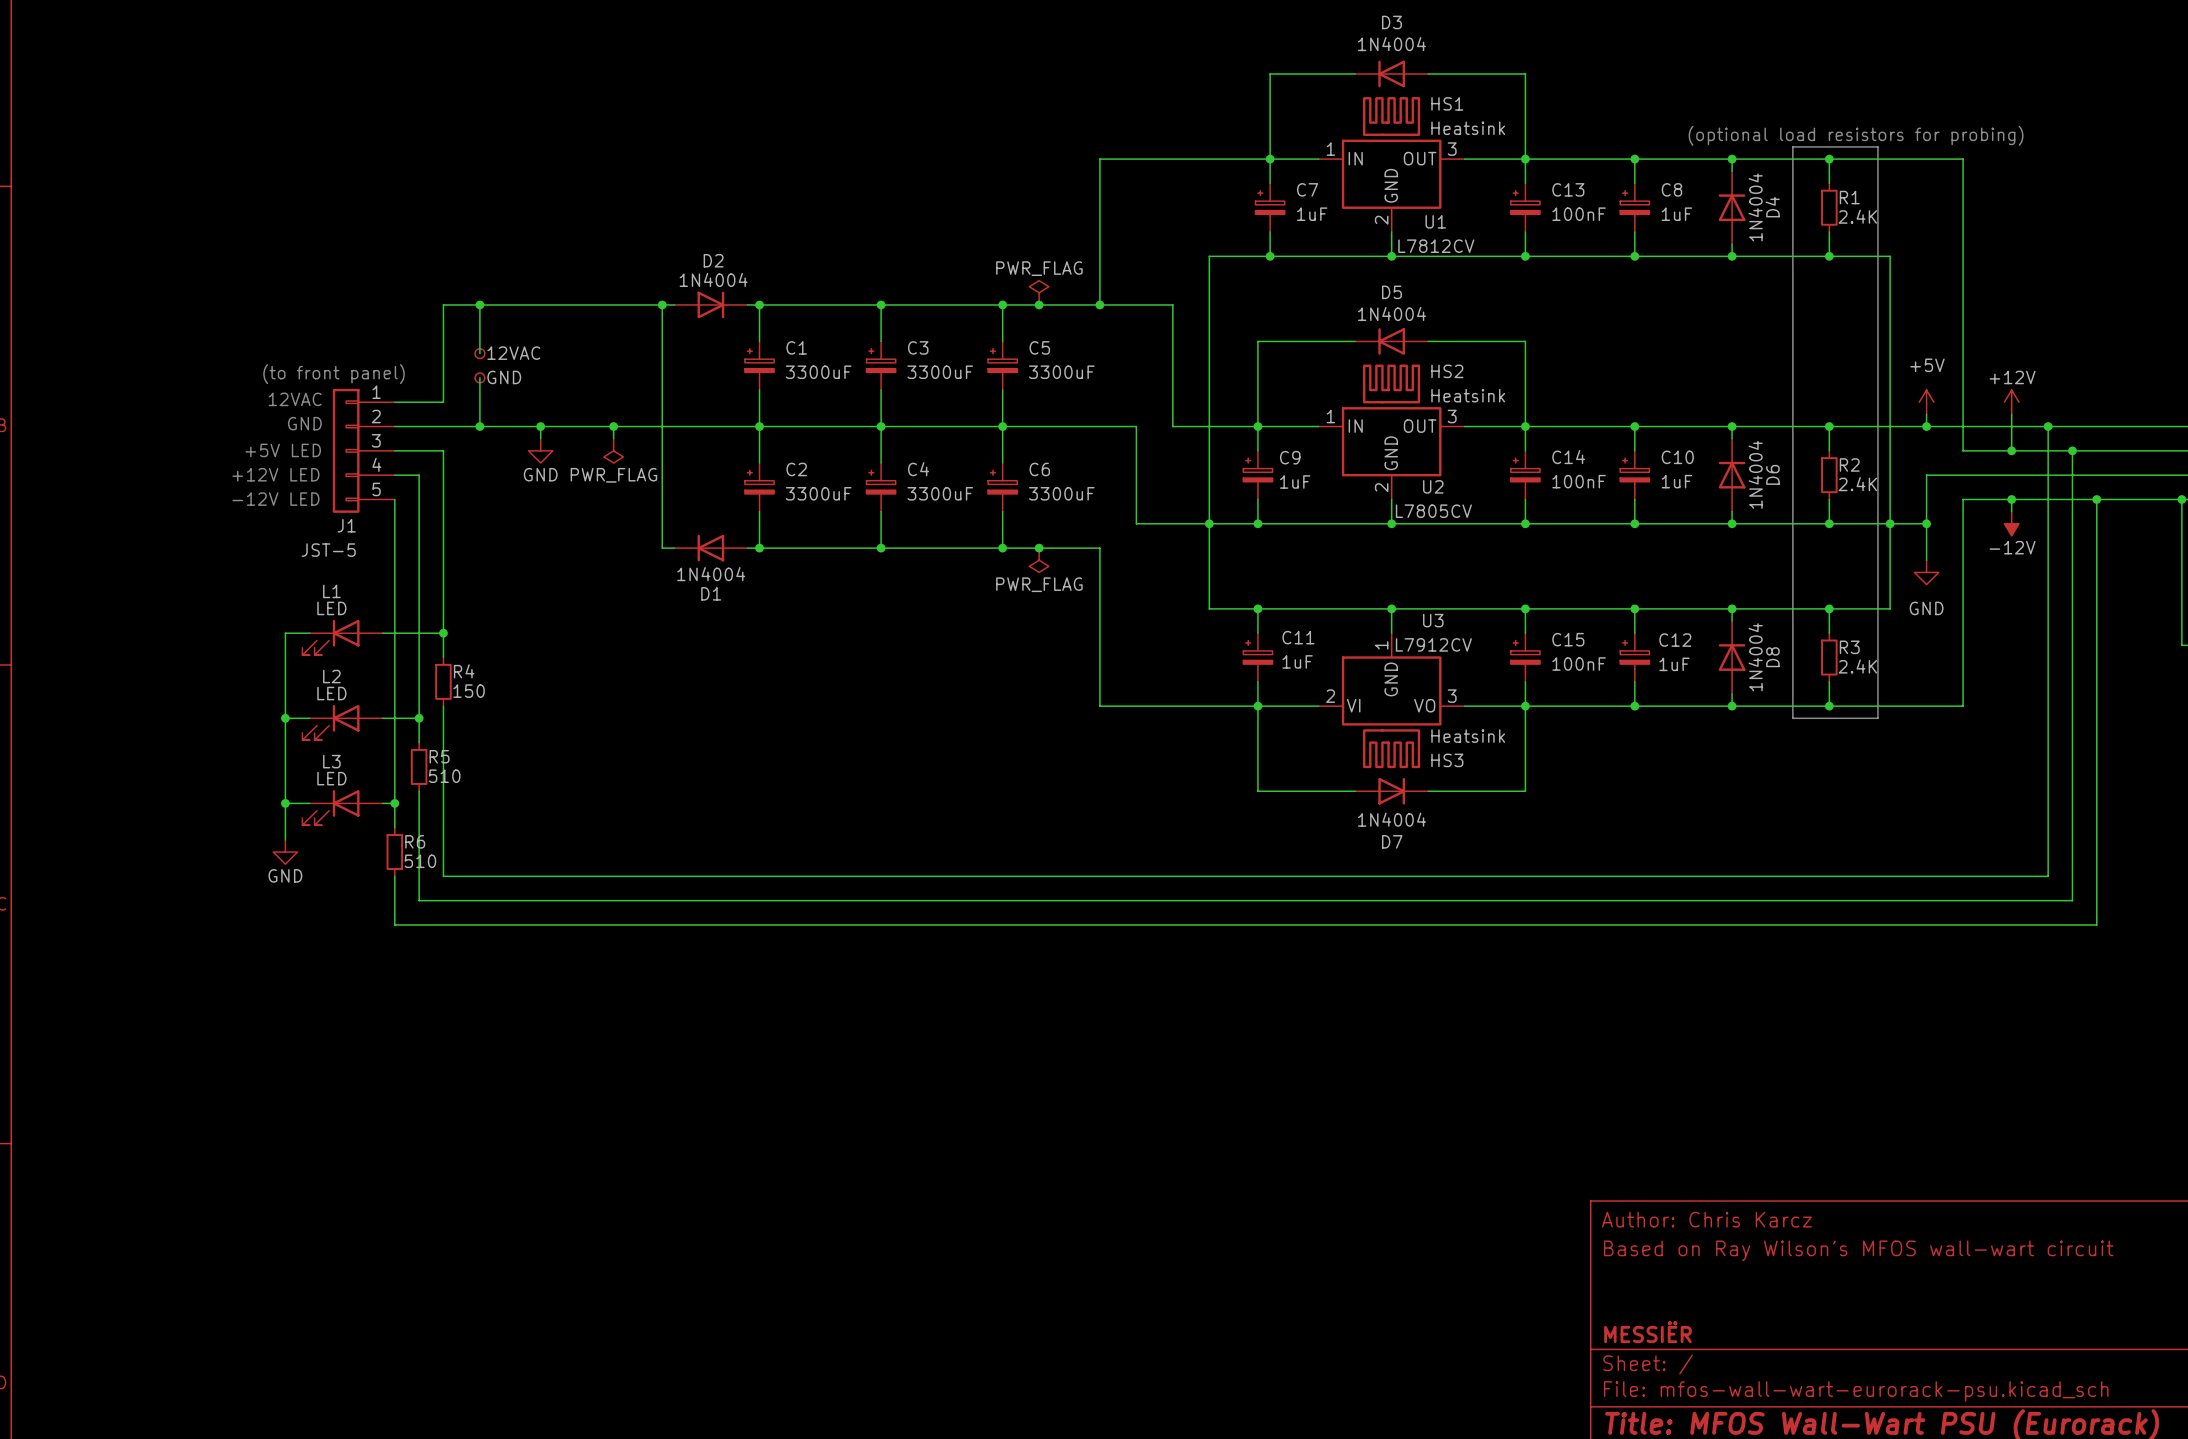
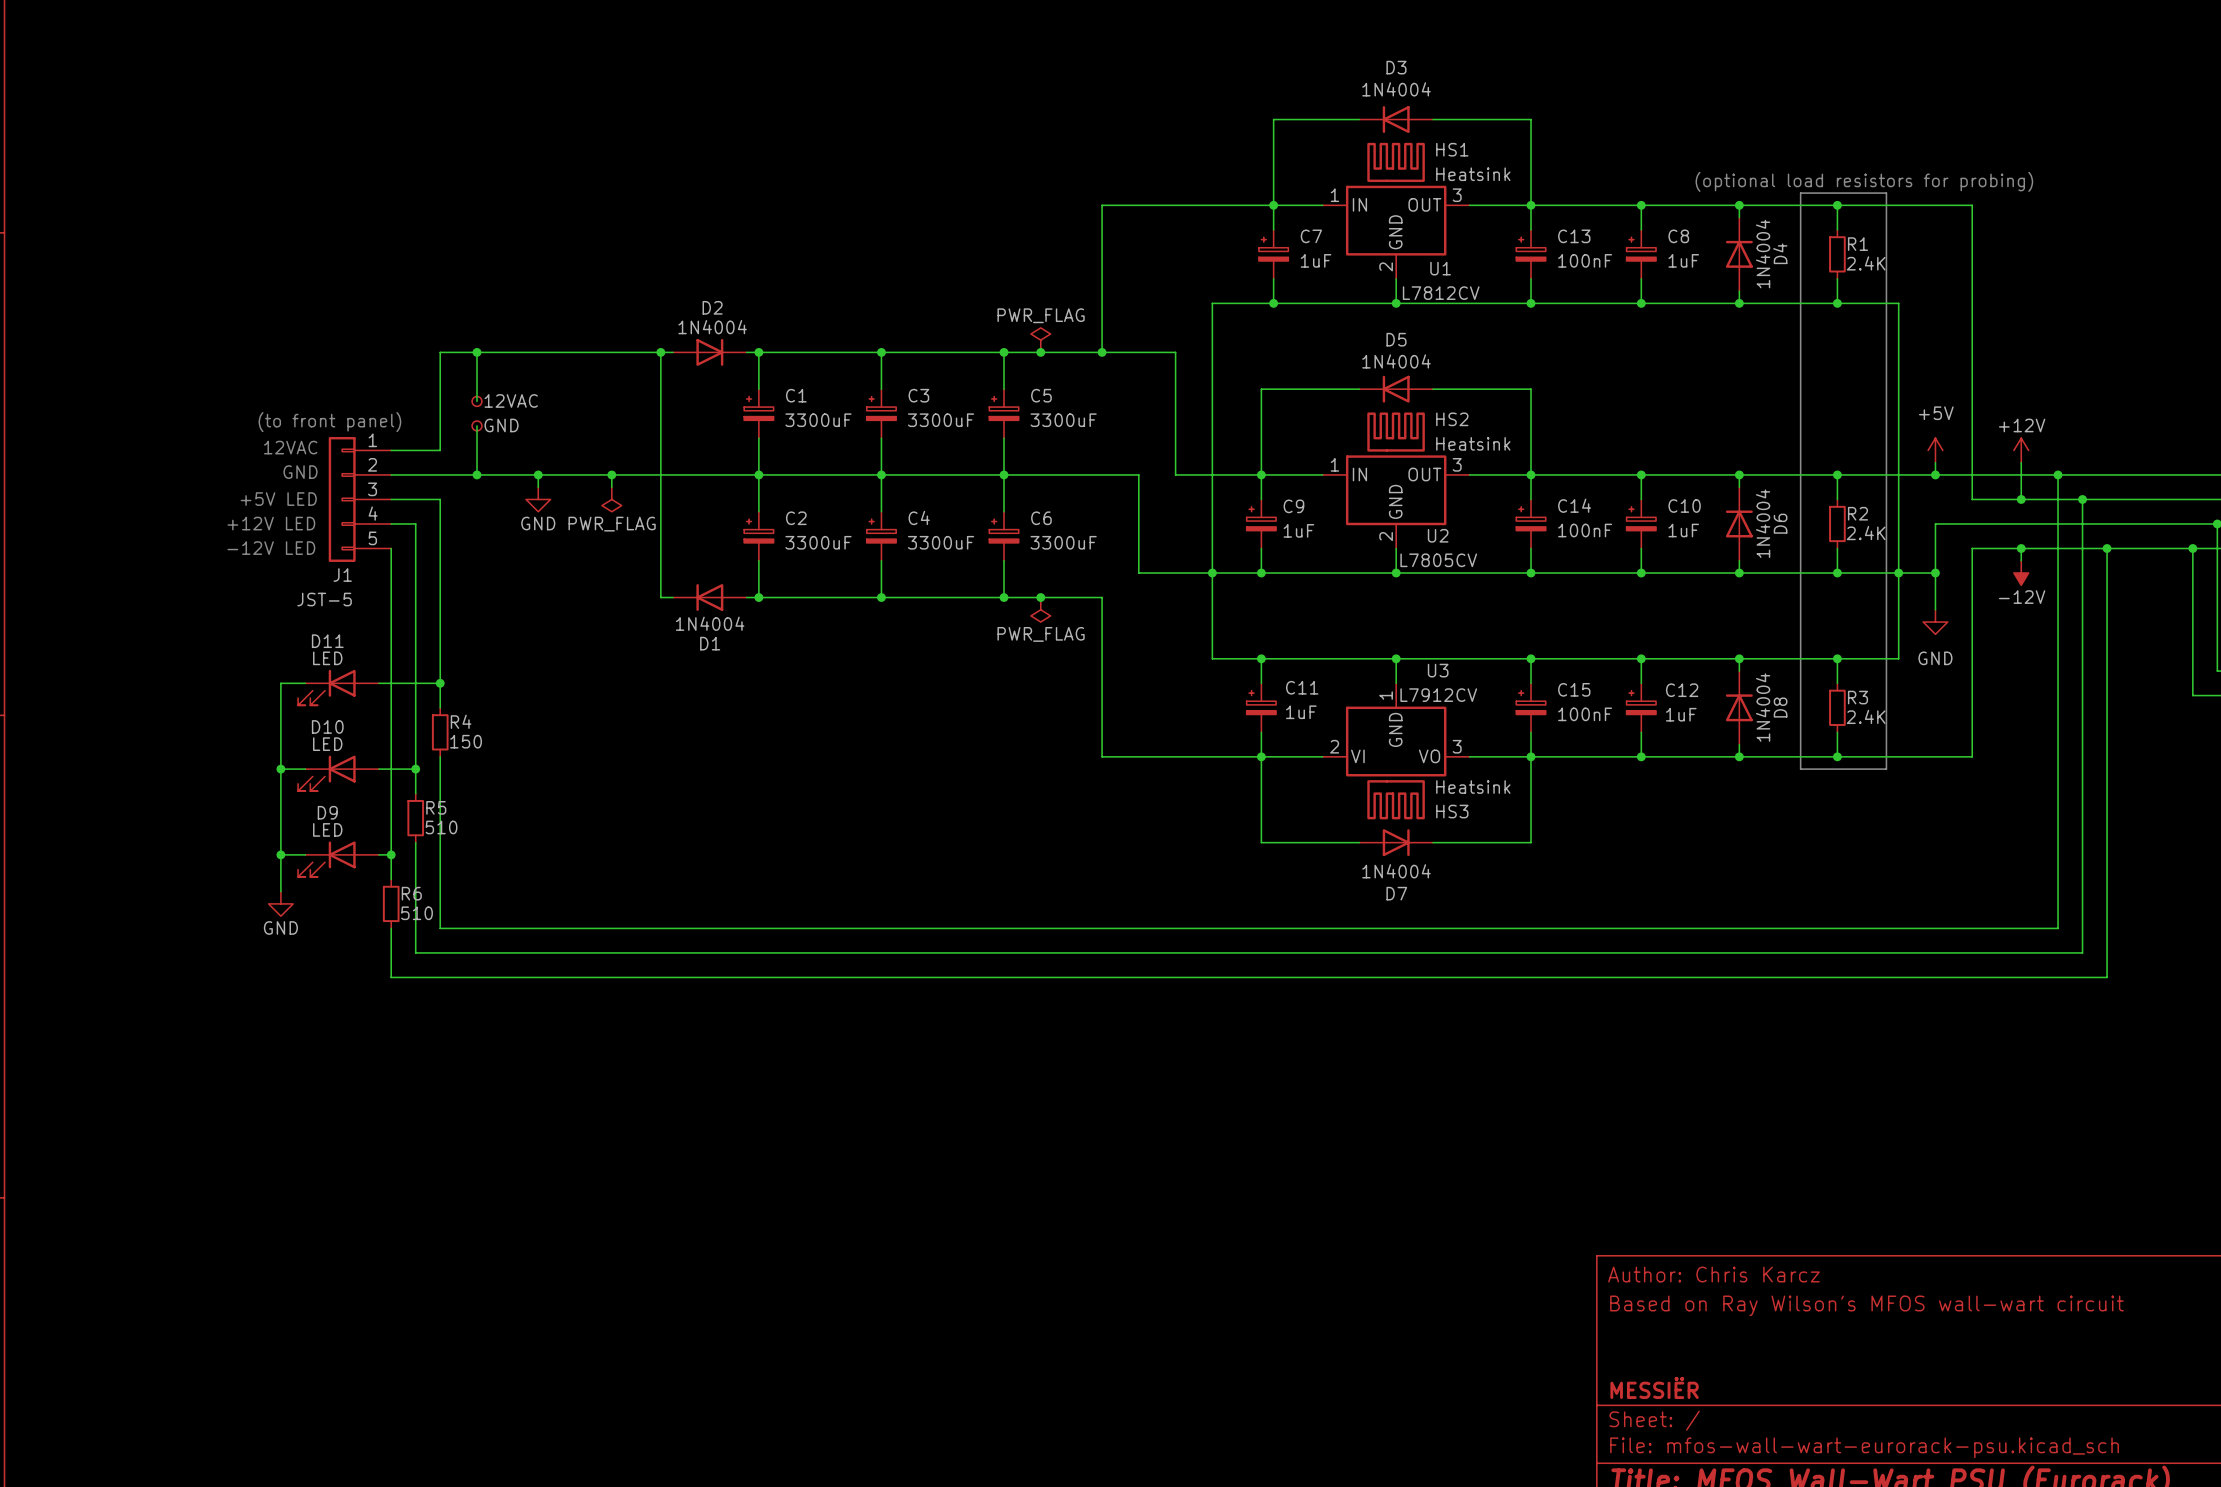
L1 name: L1 (331, 591) -> D11 (327, 641)
L2 name: L2 (331, 676) -> D10 (327, 726)
L3 name: L3 (331, 761) -> D9 (327, 812)

